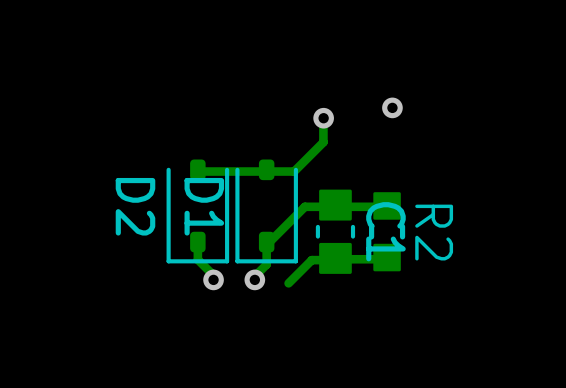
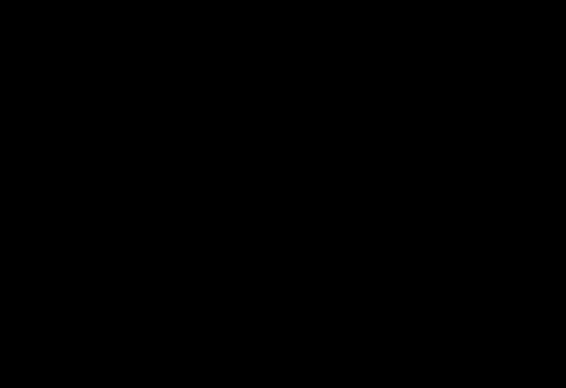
via: (392, 107) -> none
track: (323, 116) (323, 142) (294, 171) (197, 171) -> none
via: (323, 118) -> none
track: (387, 207) (304, 206) (266, 243) (266, 264) (254, 276) -> none
D2: (197, 211) -> none
D1: (266, 211) -> none
C1: (335, 231) -> none
R2: (387, 231) -> none
track: (197, 243) (197, 259) (214, 276) -> none
track: (387, 259) (311, 260) (288, 283) -> none
via: (213, 279) -> none
via: (254, 279) -> none

